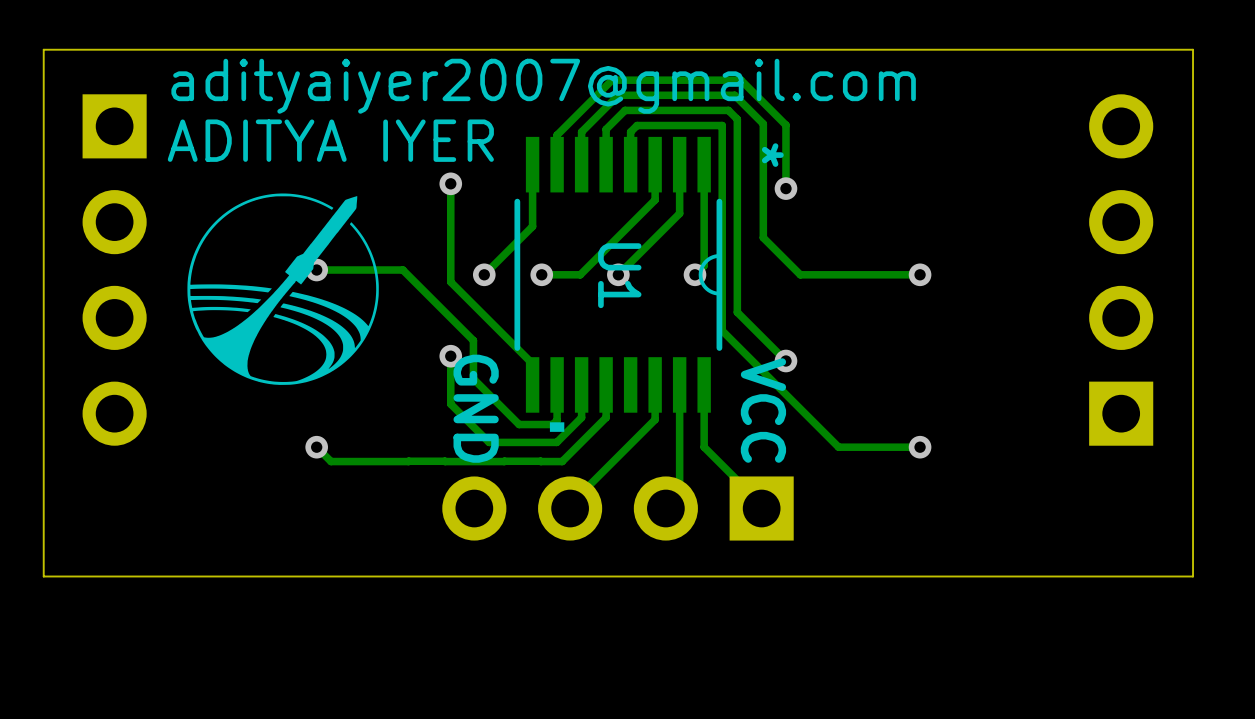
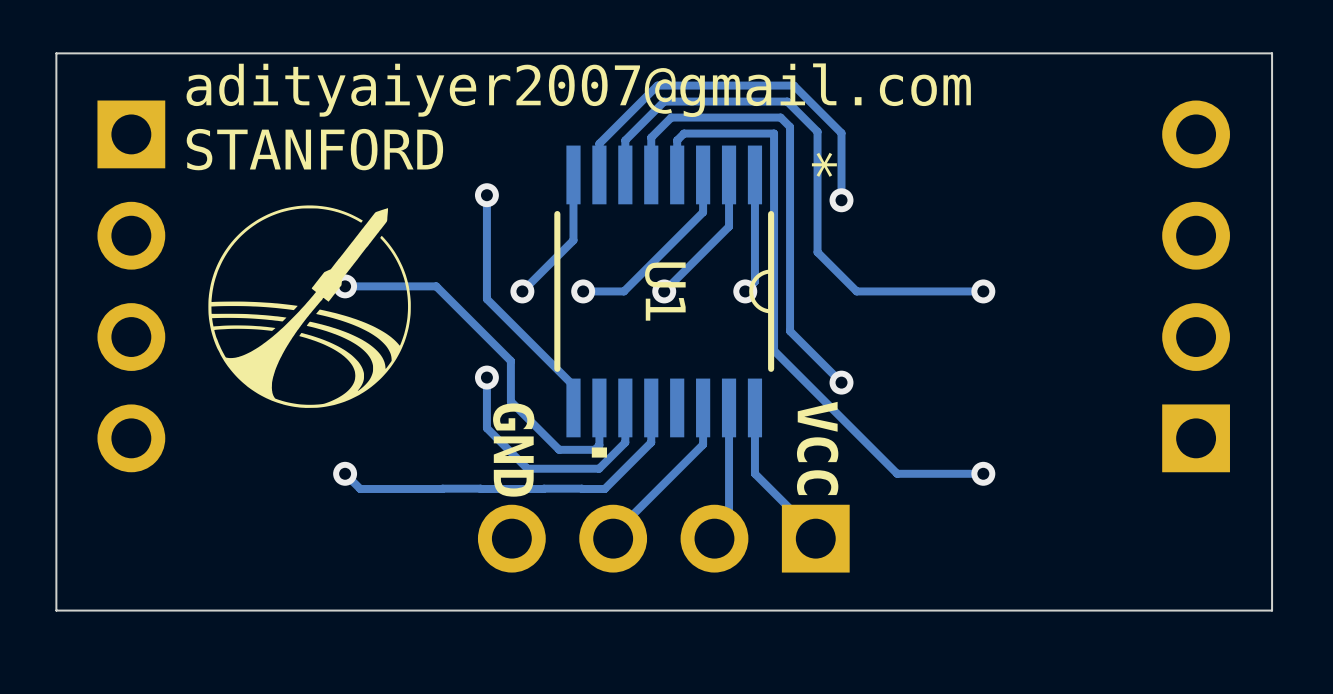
text: ADITYA IYER (330, 140) -> STANFORD (314, 149)

